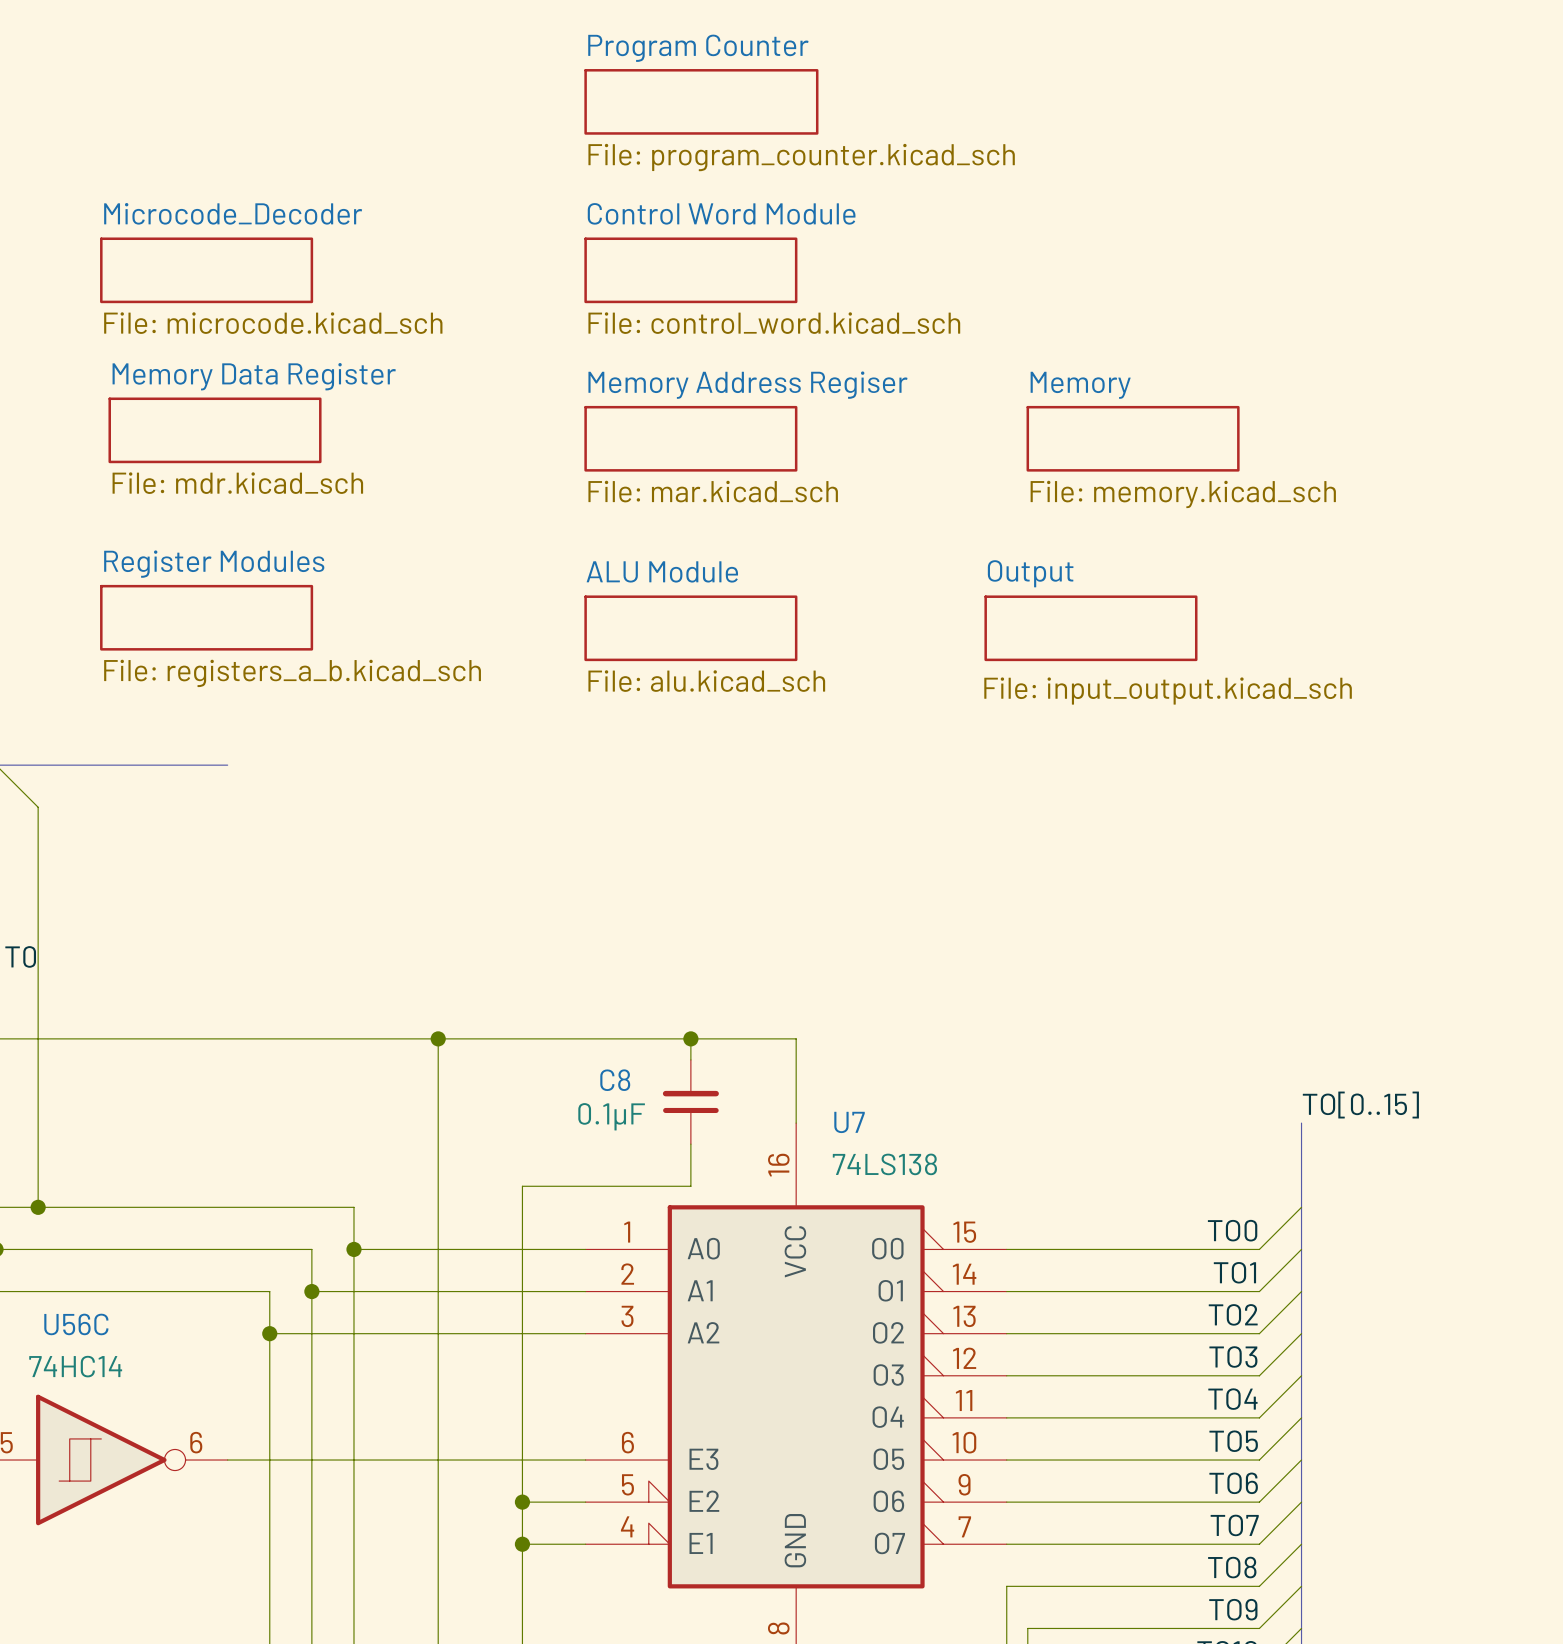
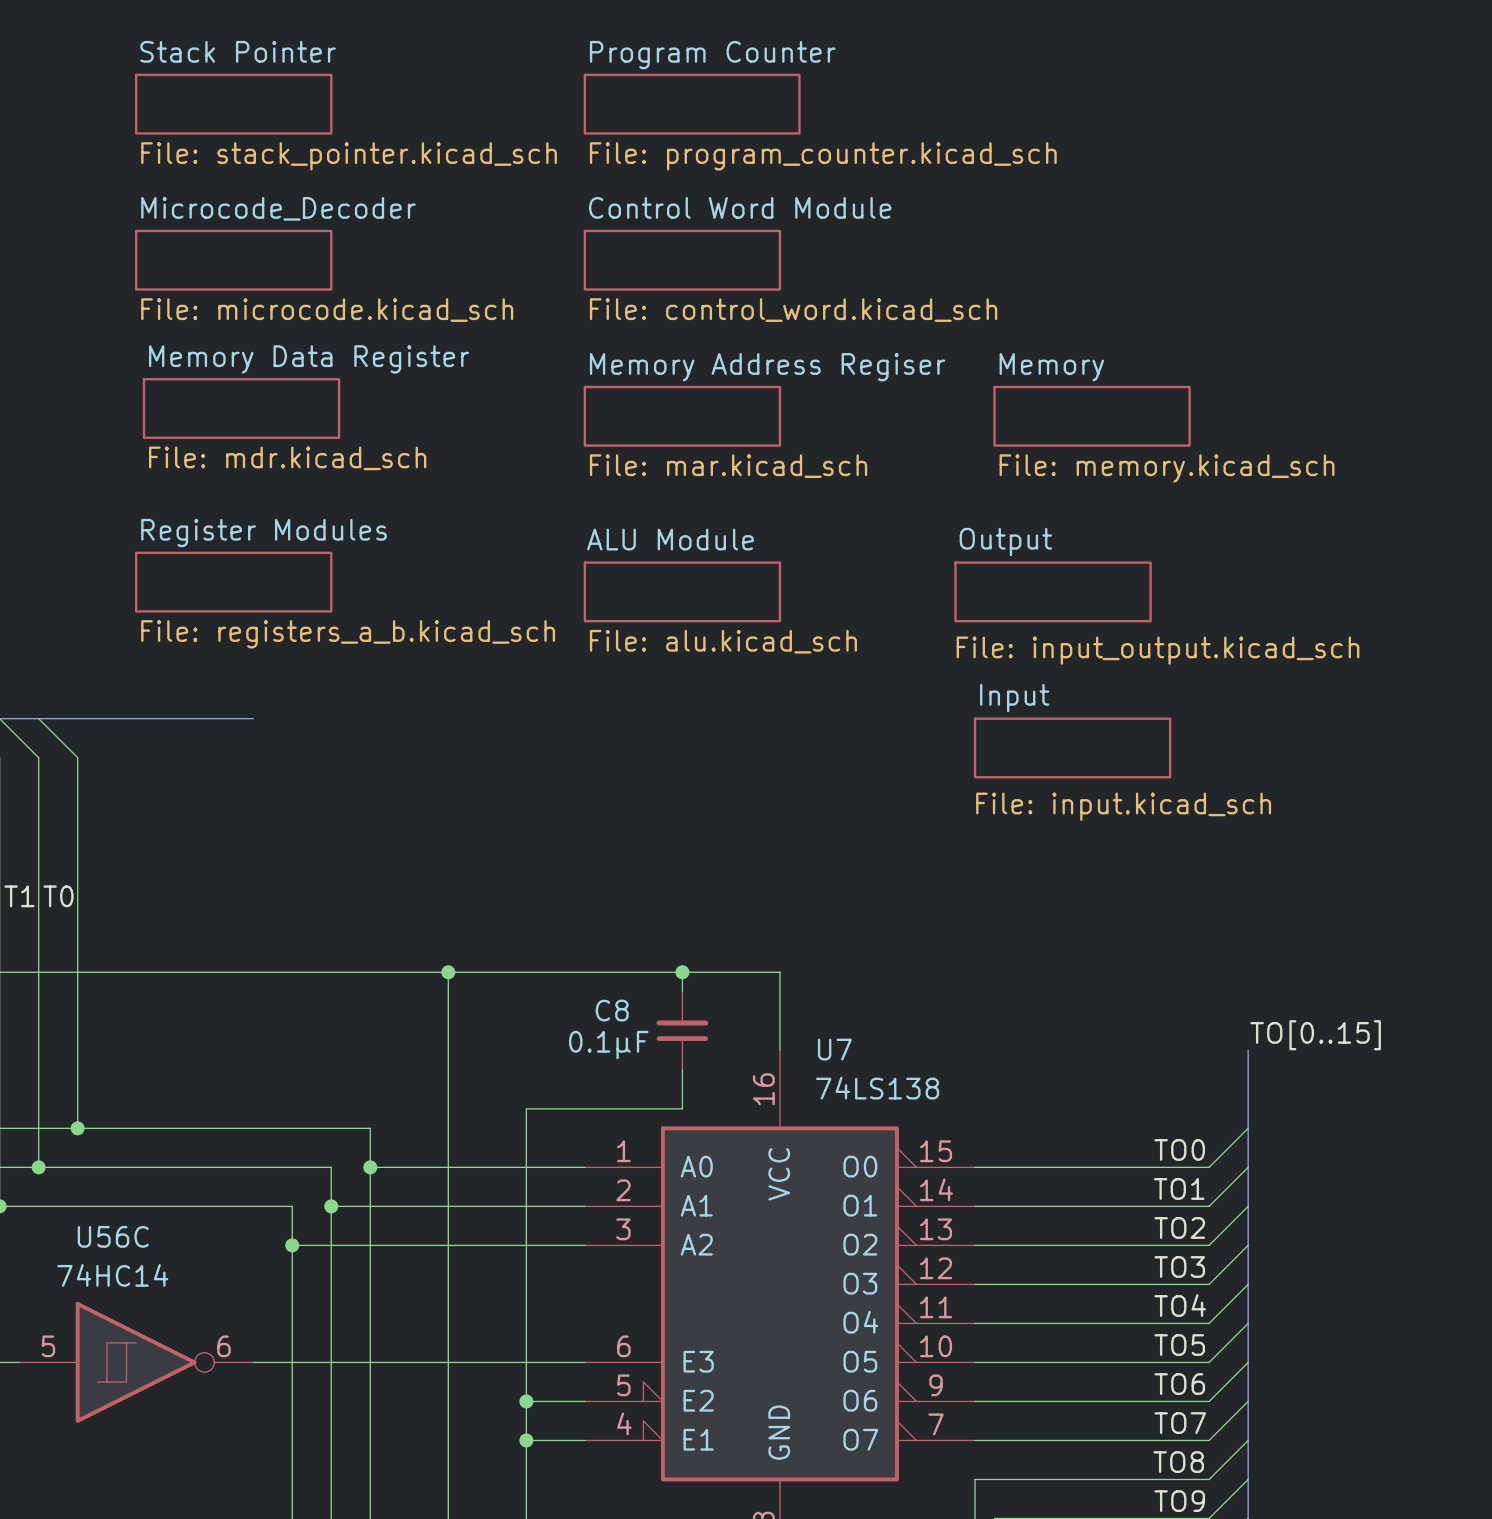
sheet Stack Pointer: none -> File: stack_pointer.kicad_sch (233, 104)
sheet Input: none -> File: input.kicad_sch (1072, 747)

